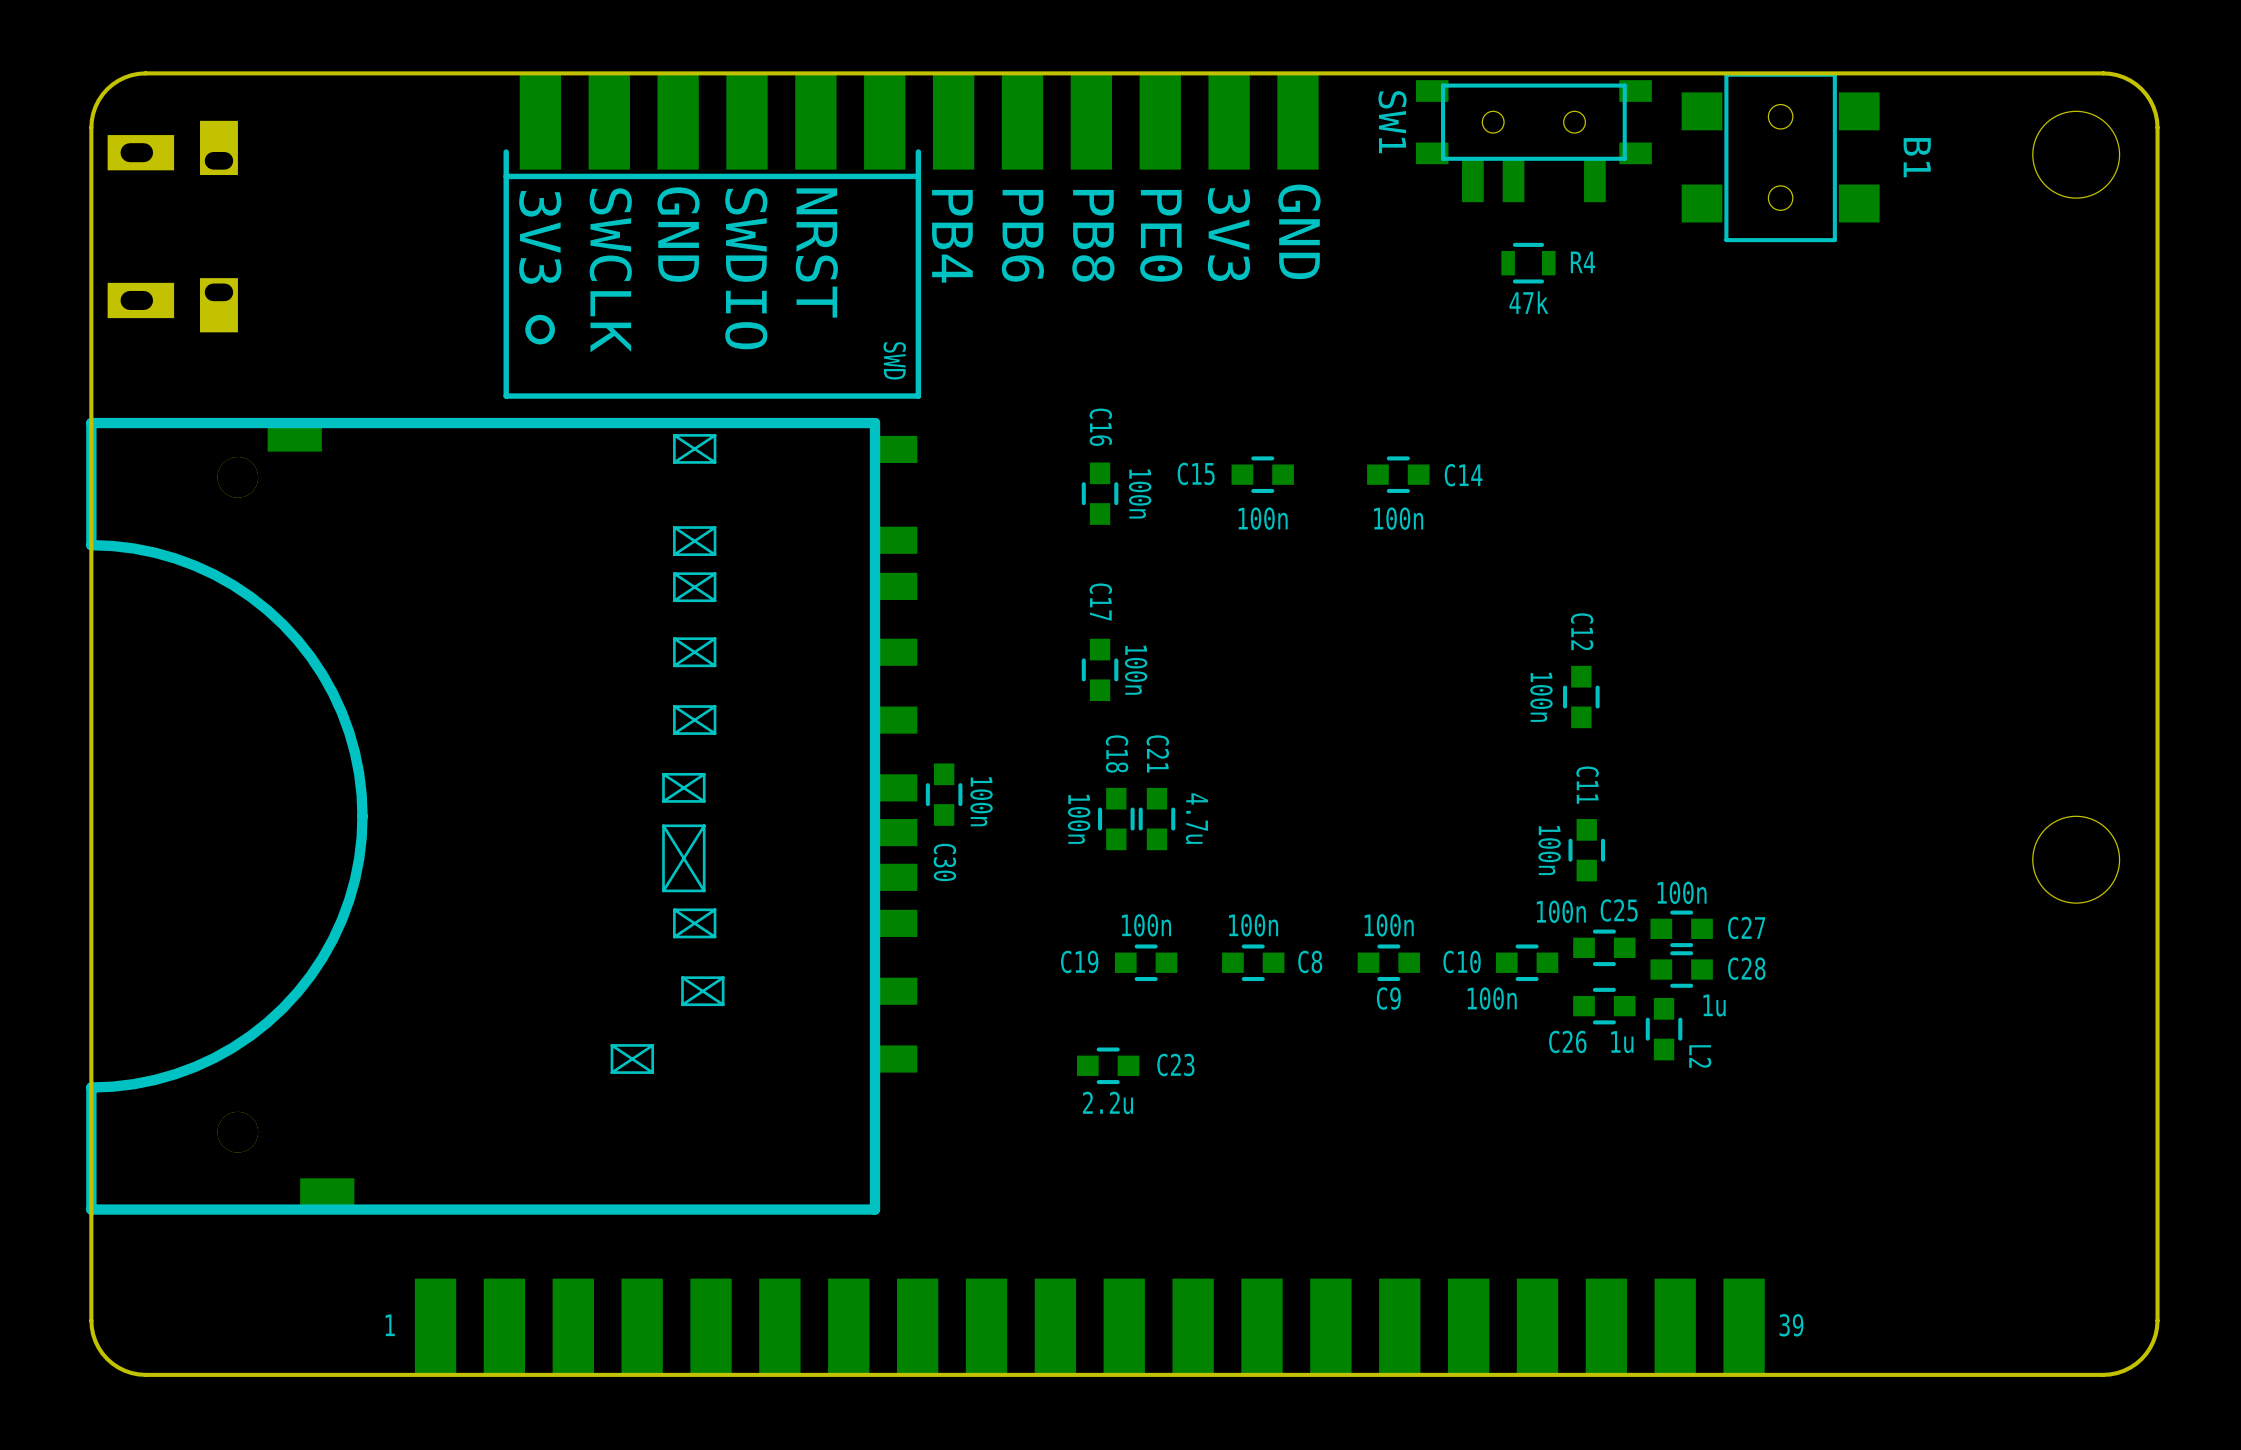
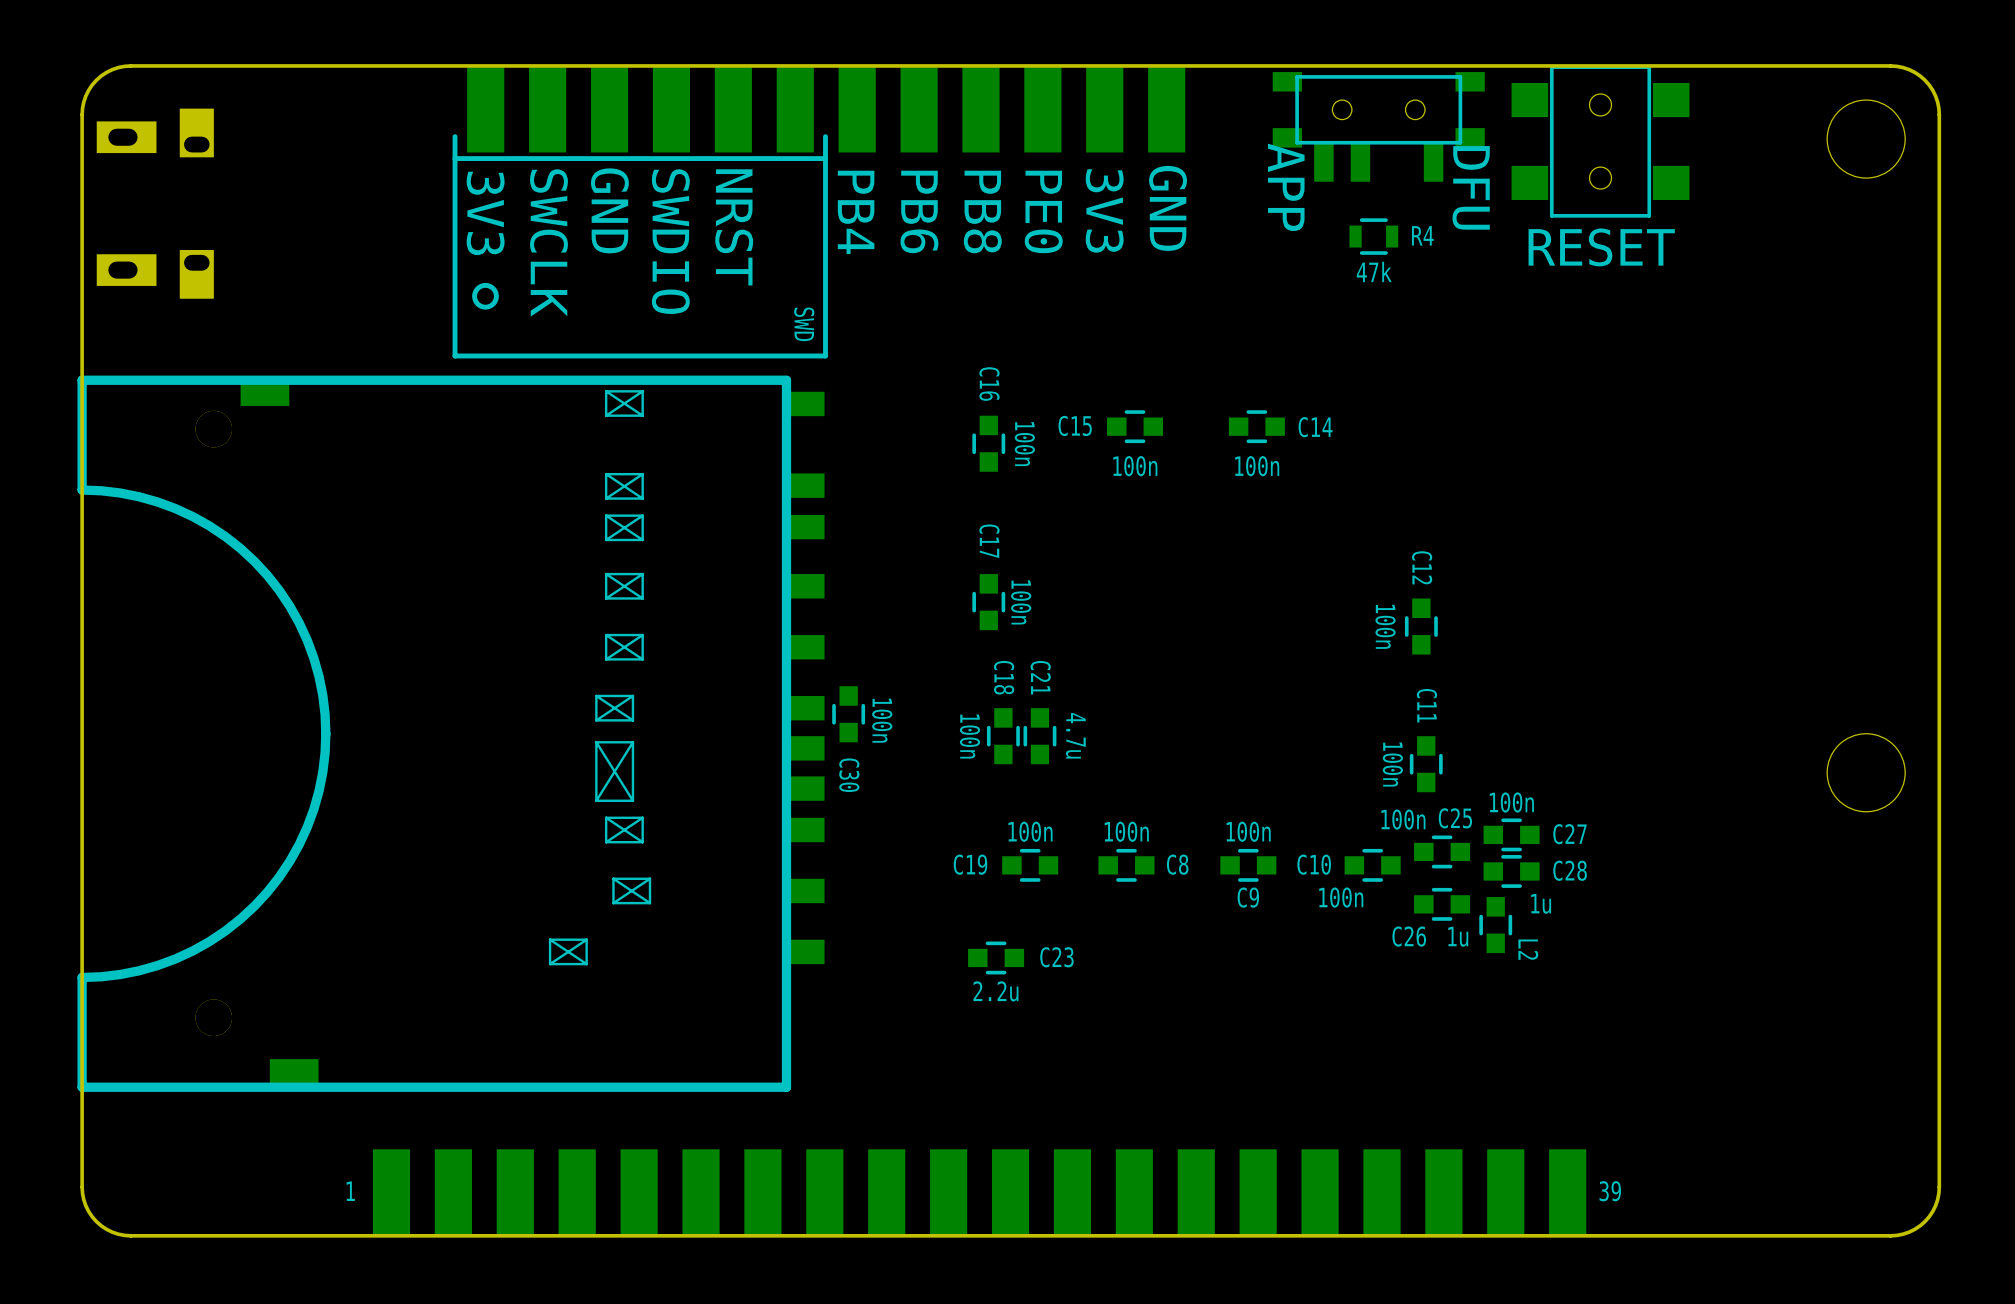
SW1 name: SW1 (1392, 122) -> none
B1 name: B1 (1917, 157) -> none
text: none -> APP (1286, 187)
text: none -> DFU (1471, 187)
text: none -> RESET (1601, 247)

